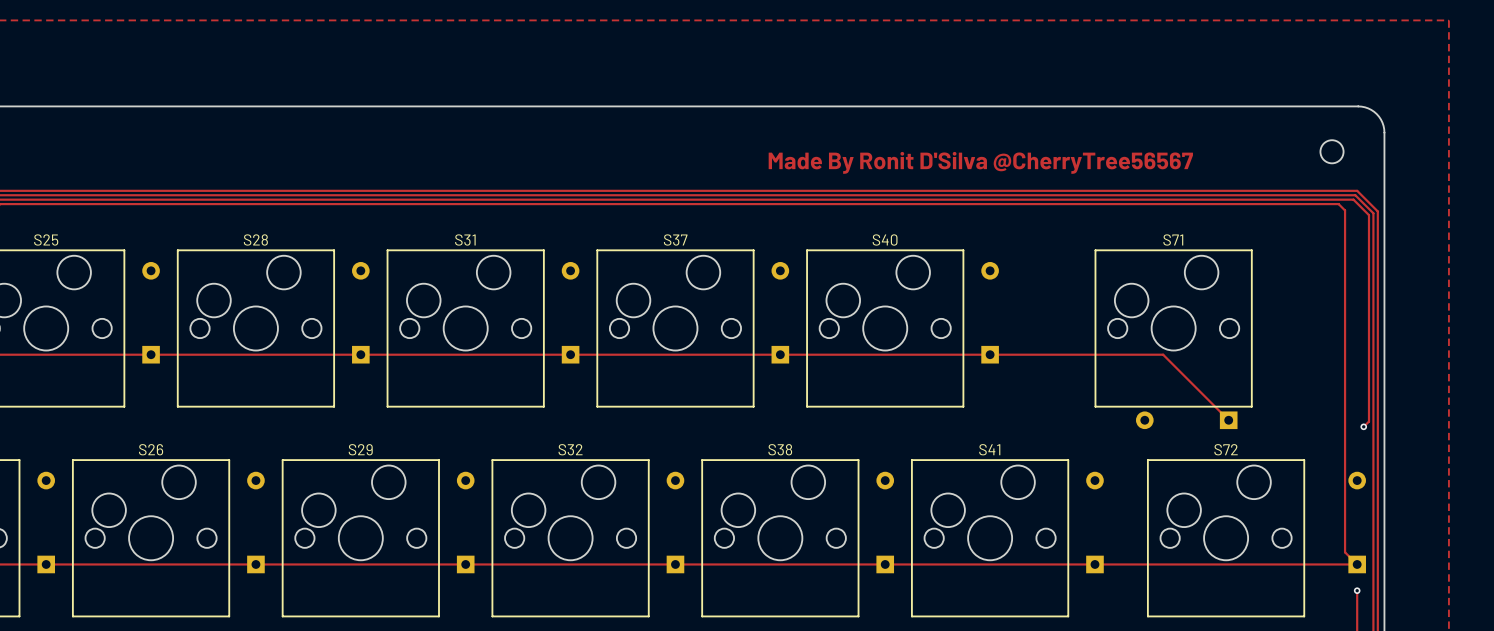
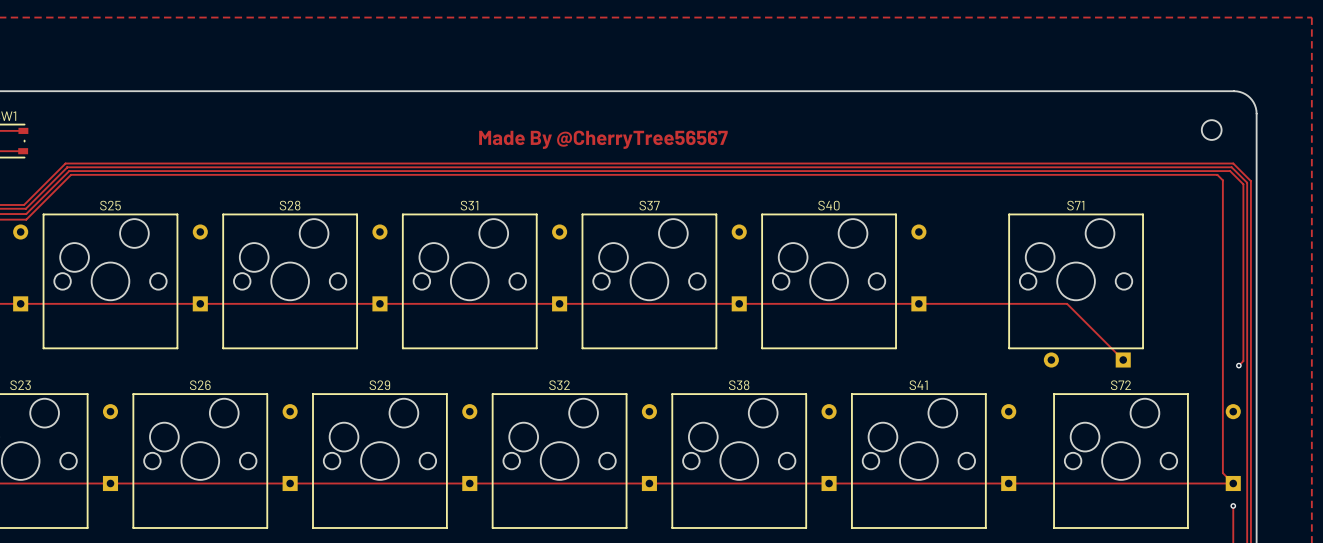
text: Made By Ronit D'Silva @CherryTree56567 (980, 162) -> Made By @CherryTree56567 (603, 139)

